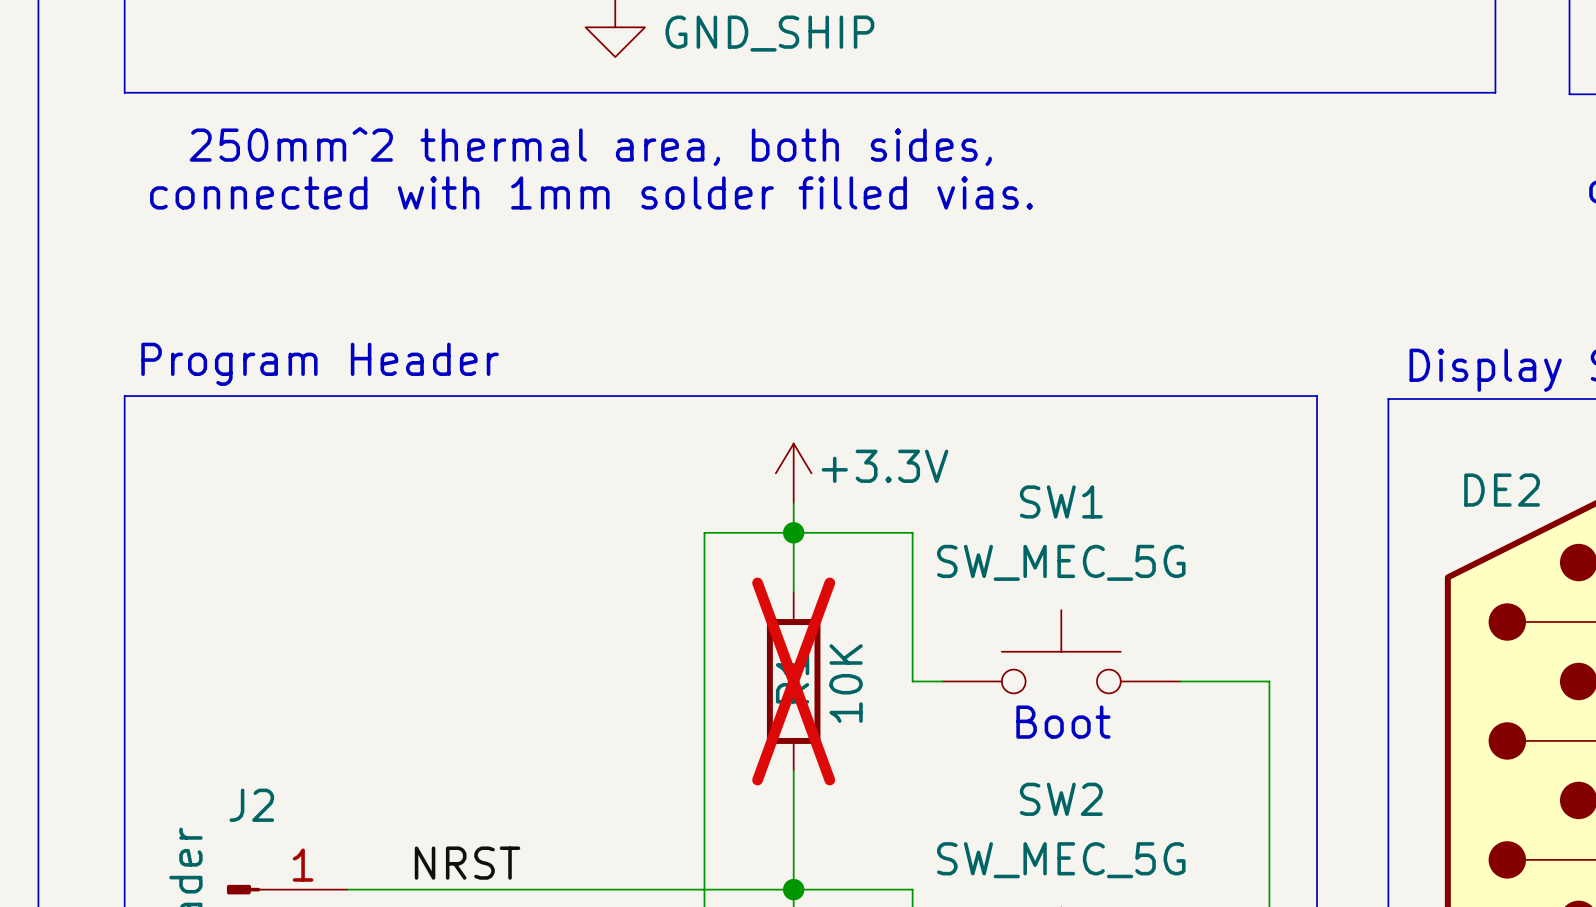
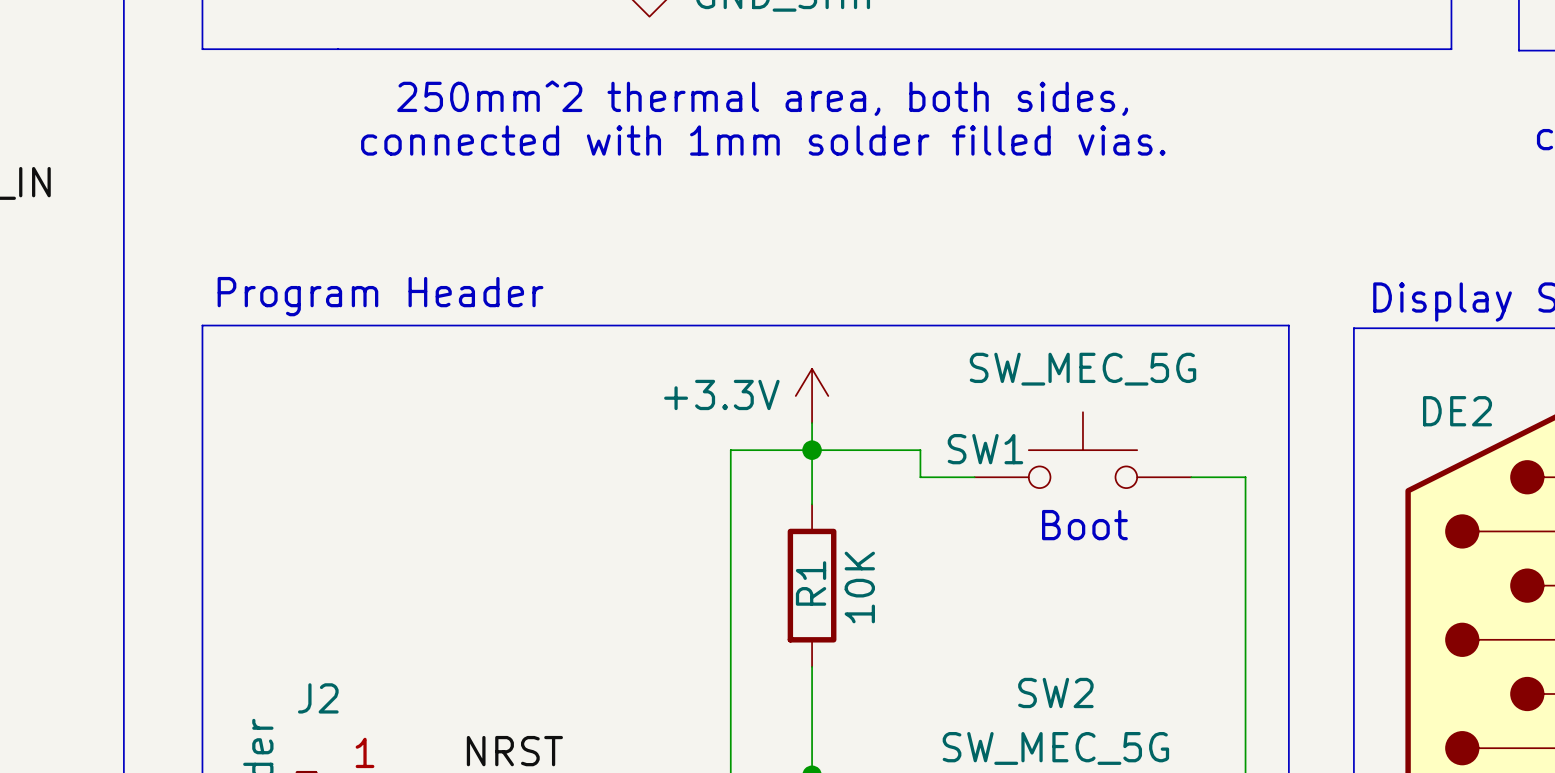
text position: 250mm^2 thermal area, both sides, (590, 146) -> 250mm^2 thermal area, both sides, (762, 98)
text position: connected with 1mm solder filled vias. (591, 192) -> connected with 1mm solder filled vias. (763, 140)
power symbol text position: +3.3V (885, 466) -> +3.3V (721, 394)
SW1 name position: SW1 (1061, 501) -> SW1 (985, 449)
wire: (912, 562) (912, 681) (942, 681) -> (920, 477) (974, 477)
SW1 position: (1061, 651) -> (1082, 450)
R1 do-not-place cross: (793, 681) -> none
wire: (1180, 681) (1269, 681) -> (1191, 477) (1245, 477) (1245, 585)
text position: Boot (1063, 722) -> Boot (1084, 525)

